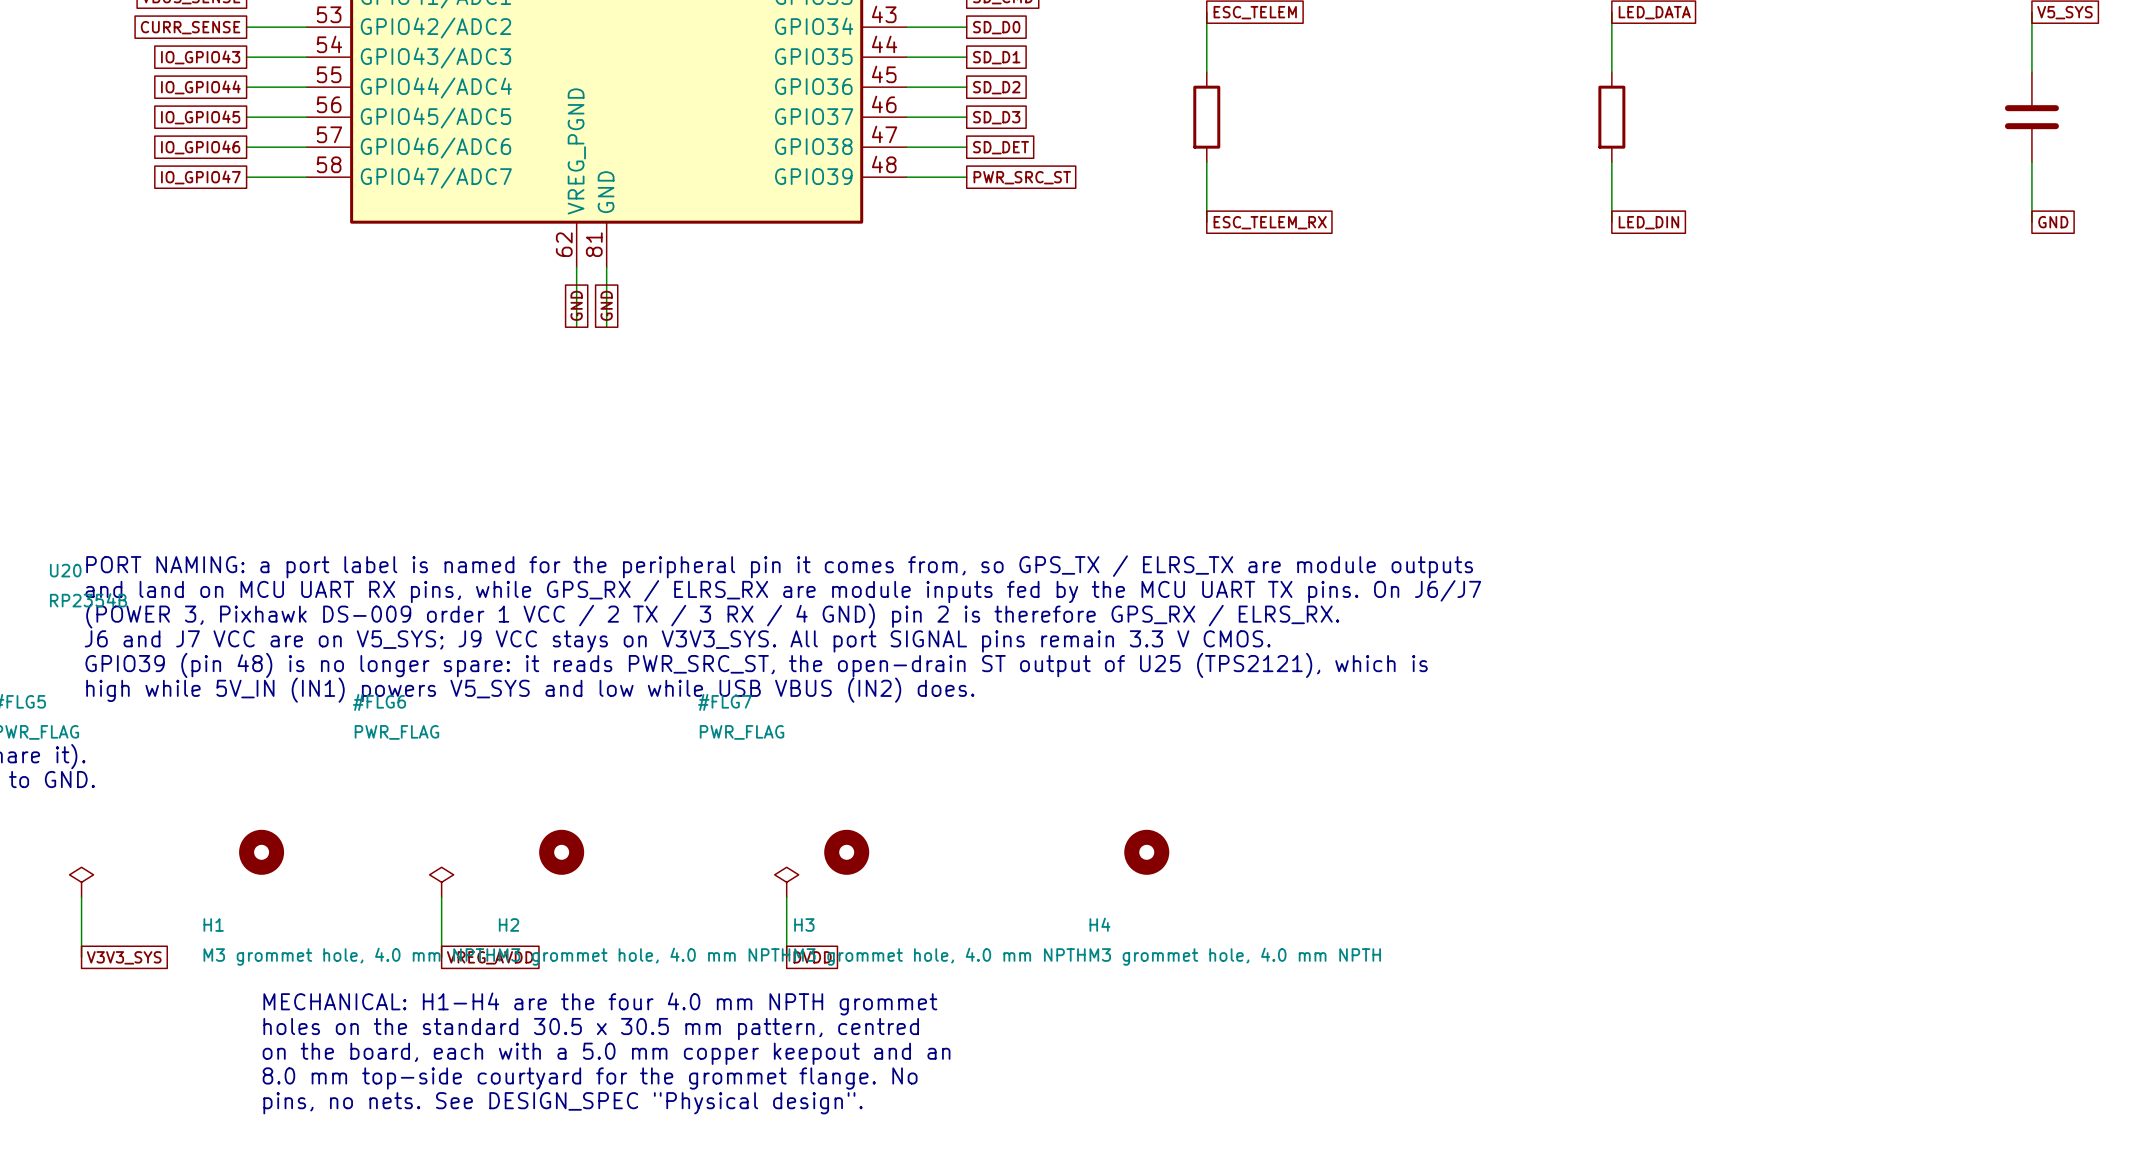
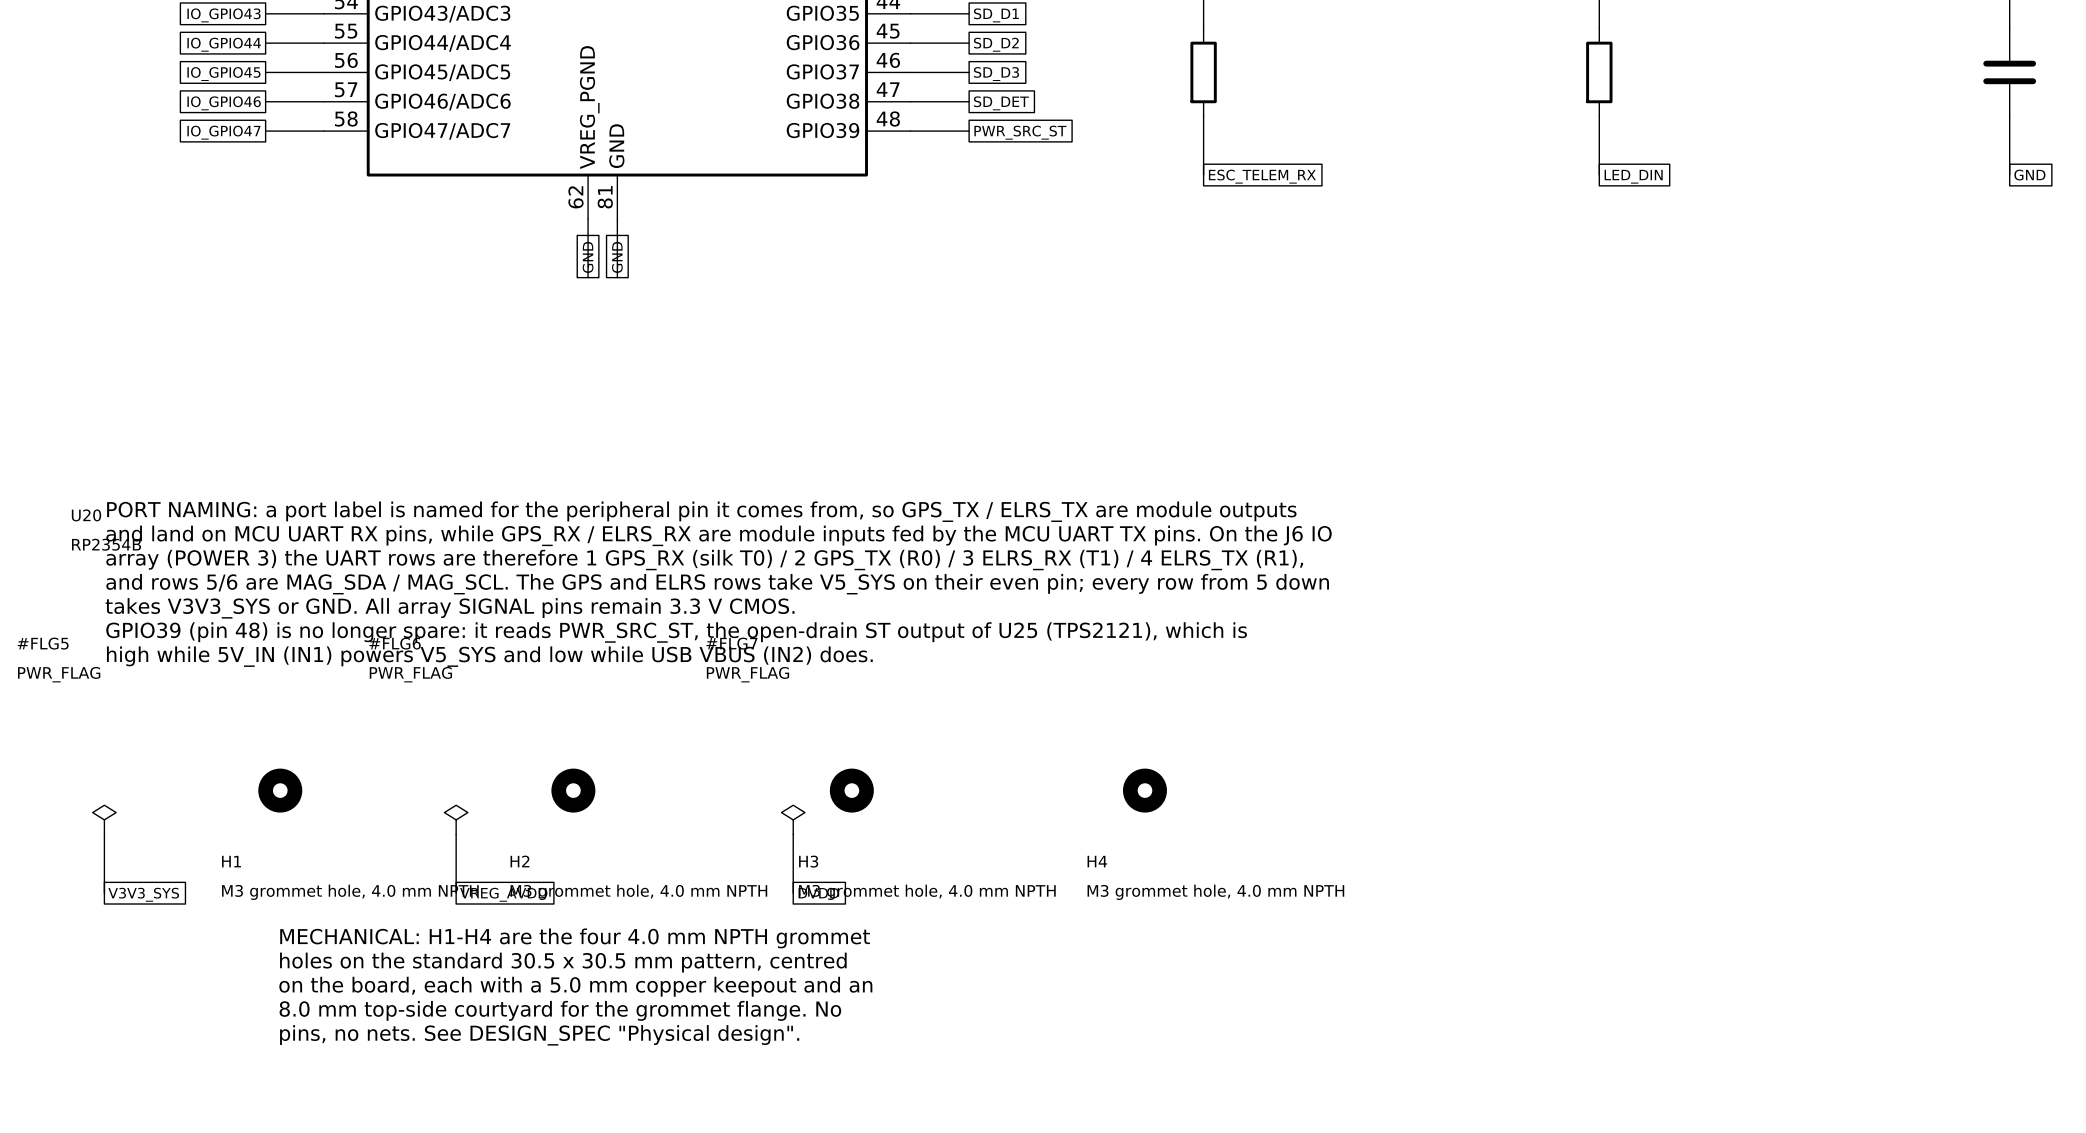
text: and land on MCU UART RX pins, while GPS_RX / ELRS_RX are module inputs fed by the MCU UART TX pins. On J6/J7 (783, 591) -> and land on MCU UART RX pins, while GPS_RX / ELRS_RX are module inputs fed by the MCU UART TX pins. On the J6 IO (719, 535)
text: (POWER 3, Pixhawk DS-009 order 1 VCC / 2 TX / 3 RX / 4 GND) pin 2 is therefore GPS_RX / ELRS_RX. (712, 615) -> array (POWER 3) the UART rows are therefore 1 GPS_RX (silk T0) / 2 GPS_TX (R0) / 3 ELRS_RX (T1) / 4 ELRS_TX (R1), (704, 560)
text: J6 and J7 VCC are on V5_SYS; J9 VCC stays on V3V3_SYS. All port SIGNAL pins remain 3.3 V CMOS. (677, 641) -> and rows 5/6 are MAG_SDA / MAG_SCL. The GPS and ELRS rows take V5_SYS on their even pin; every row from 5 down (717, 584)
text: GPIO39 (pin 48) is no longer spare: it reads PWR_SRC_ST, the open-drain ST output of U25 (TPS2121), which is (756, 665) -> takes V3V3_SYS or GND. All array SIGNAL pins remain 3.3 V CMOS. (450, 608)
text: high while 5V_IN (IN1) powers V5_SYS and low while USB VBUS (IN2) does. (530, 690) -> GPIO39 (pin 48) is no longer spare: it reads PWR_SRC_ST, the open-drain ST output of U25 (TPS2121), which is (676, 632)
text: none -> high while 5V_IN (IN1) powers V5_SYS and low while USB VBUS (IN2) does. (489, 656)

